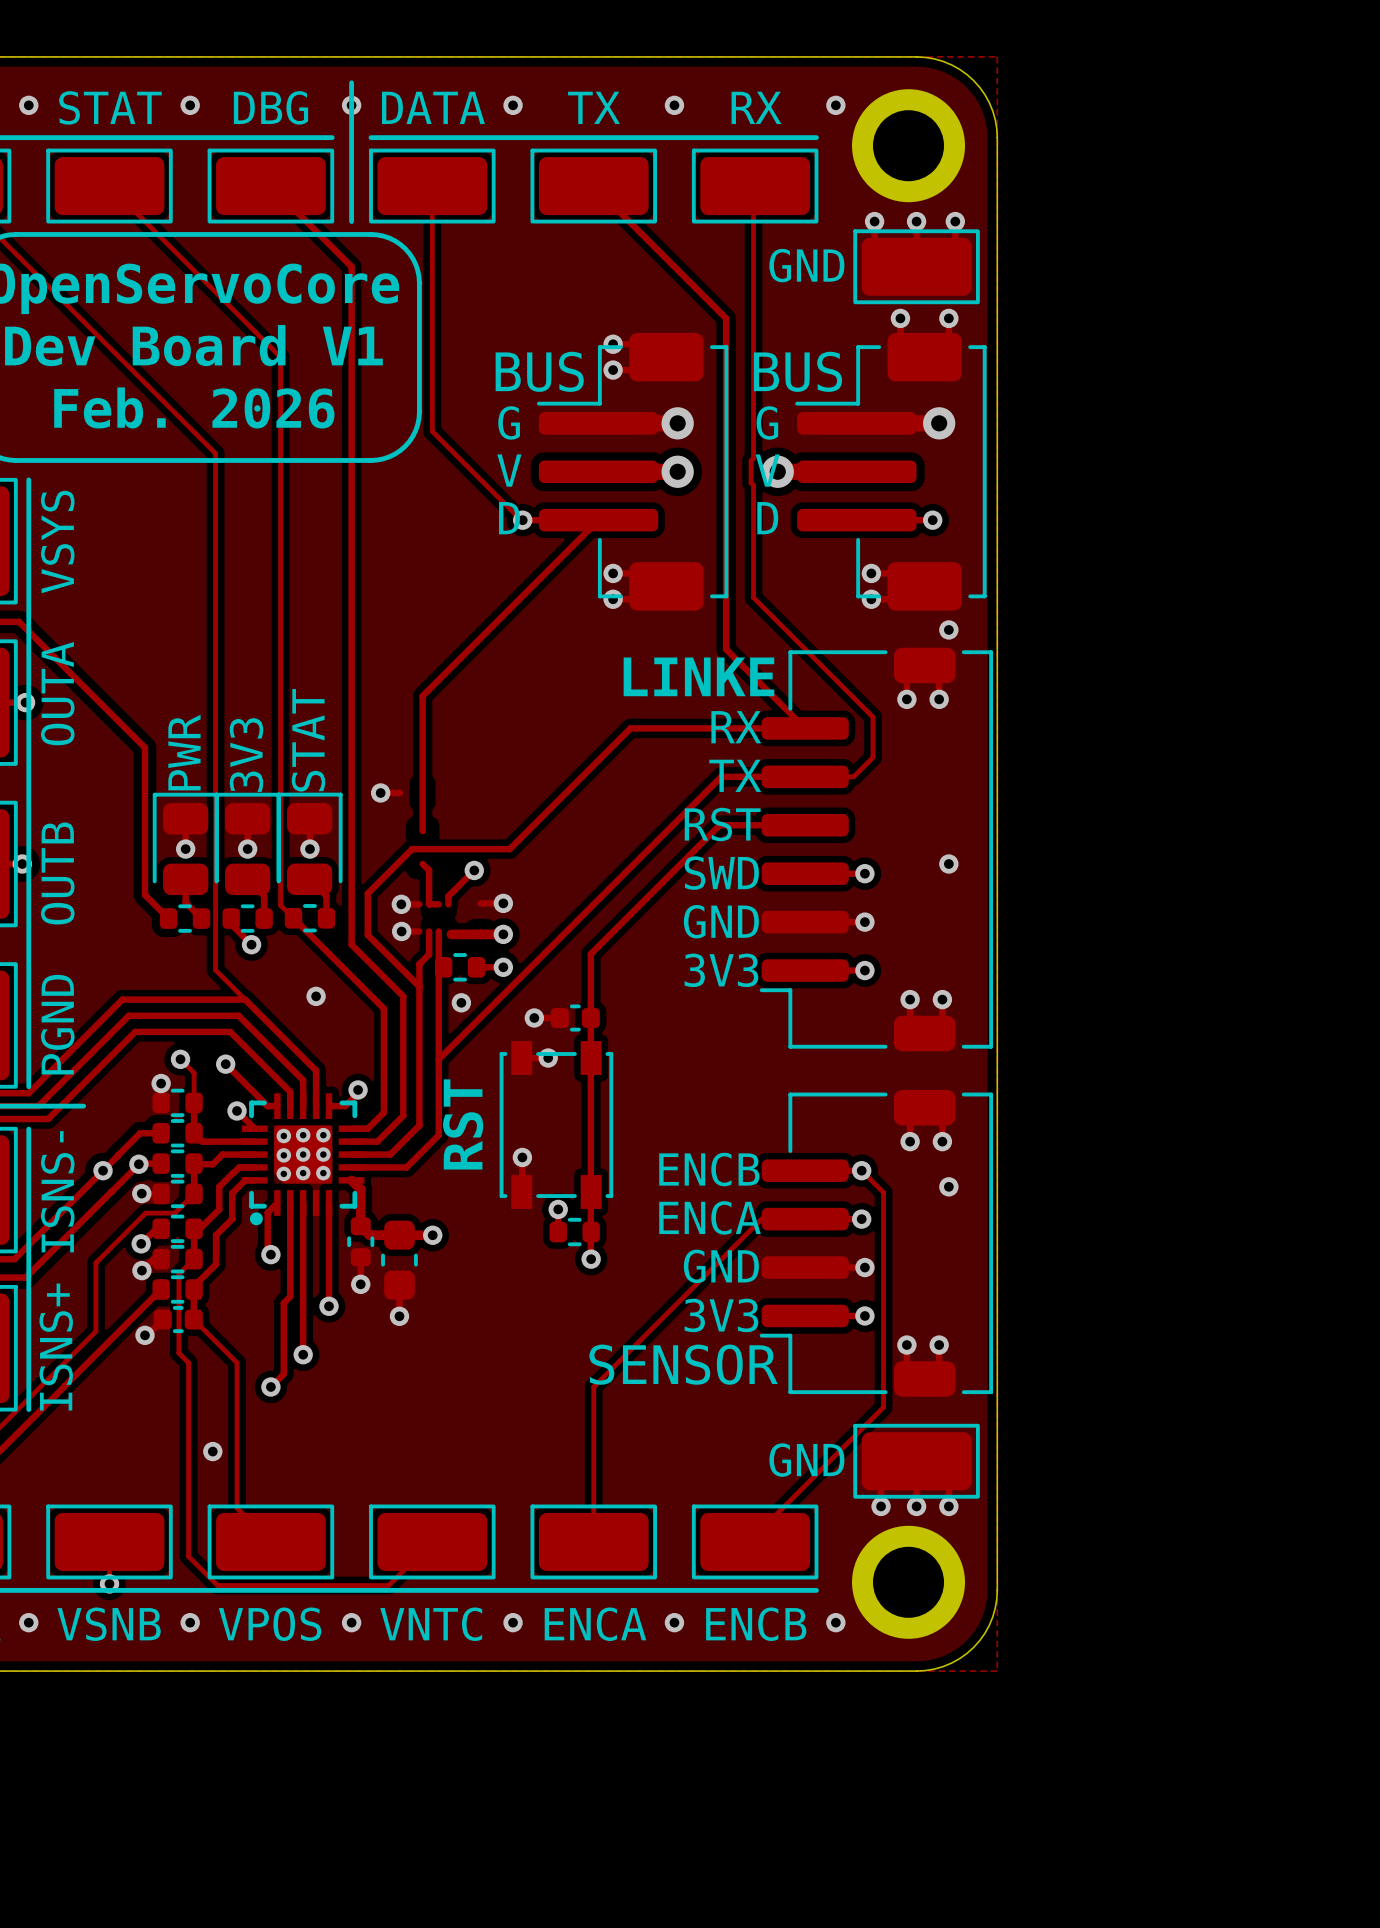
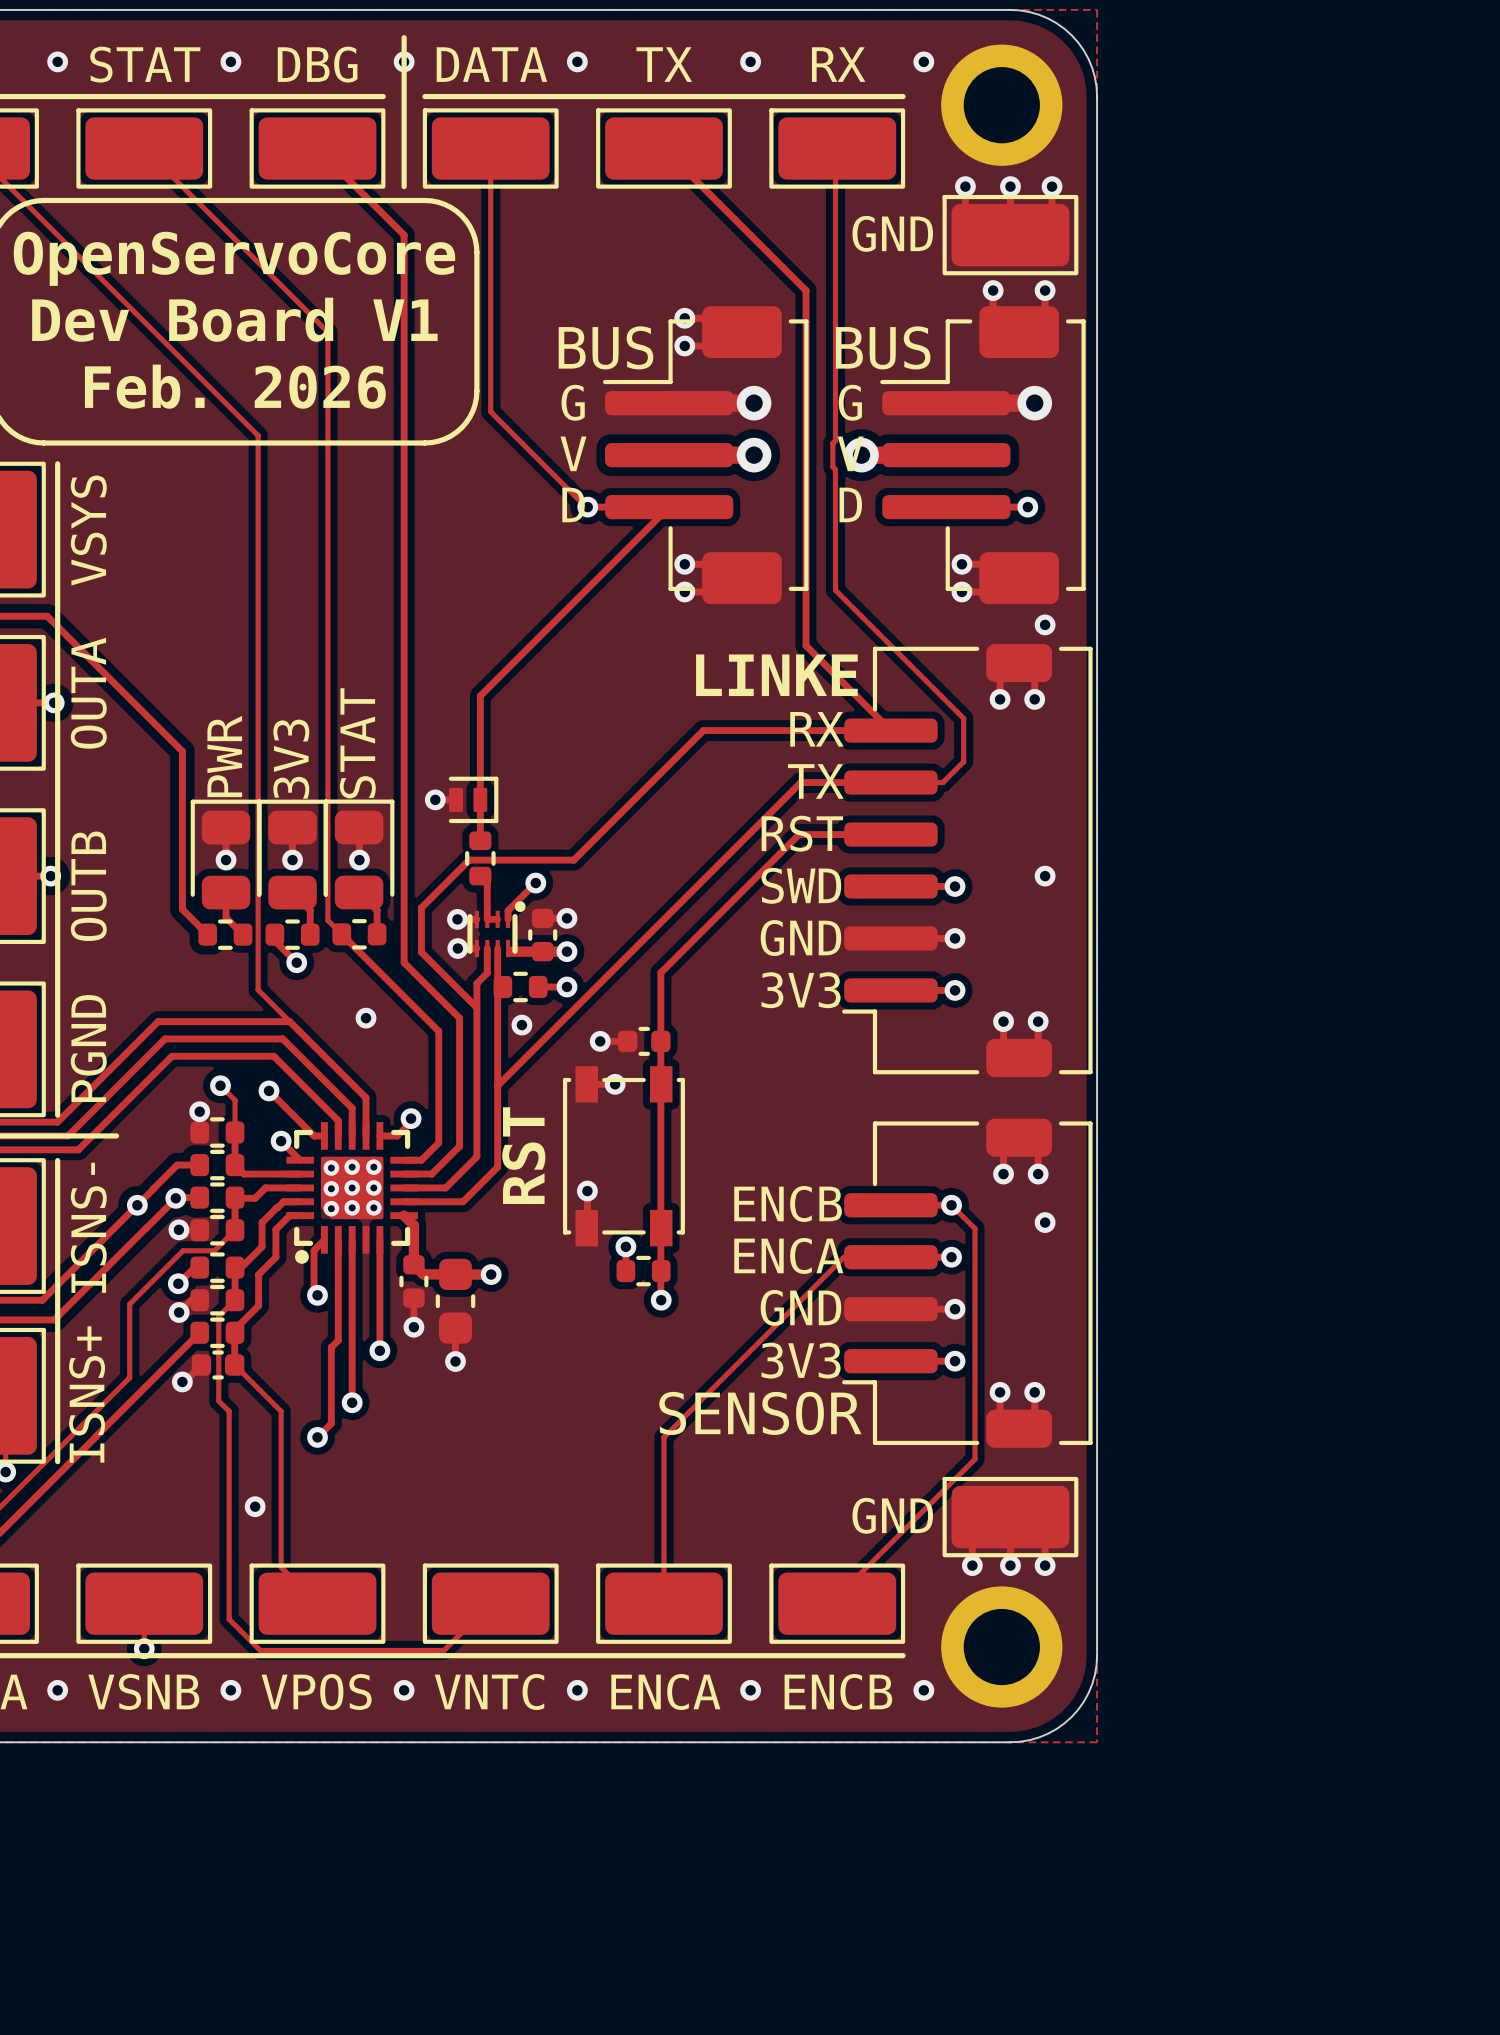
part: none -> (473, 799)
part: none -> (480, 858)
part: none -> (496, 929)
part: none -> (542, 935)

